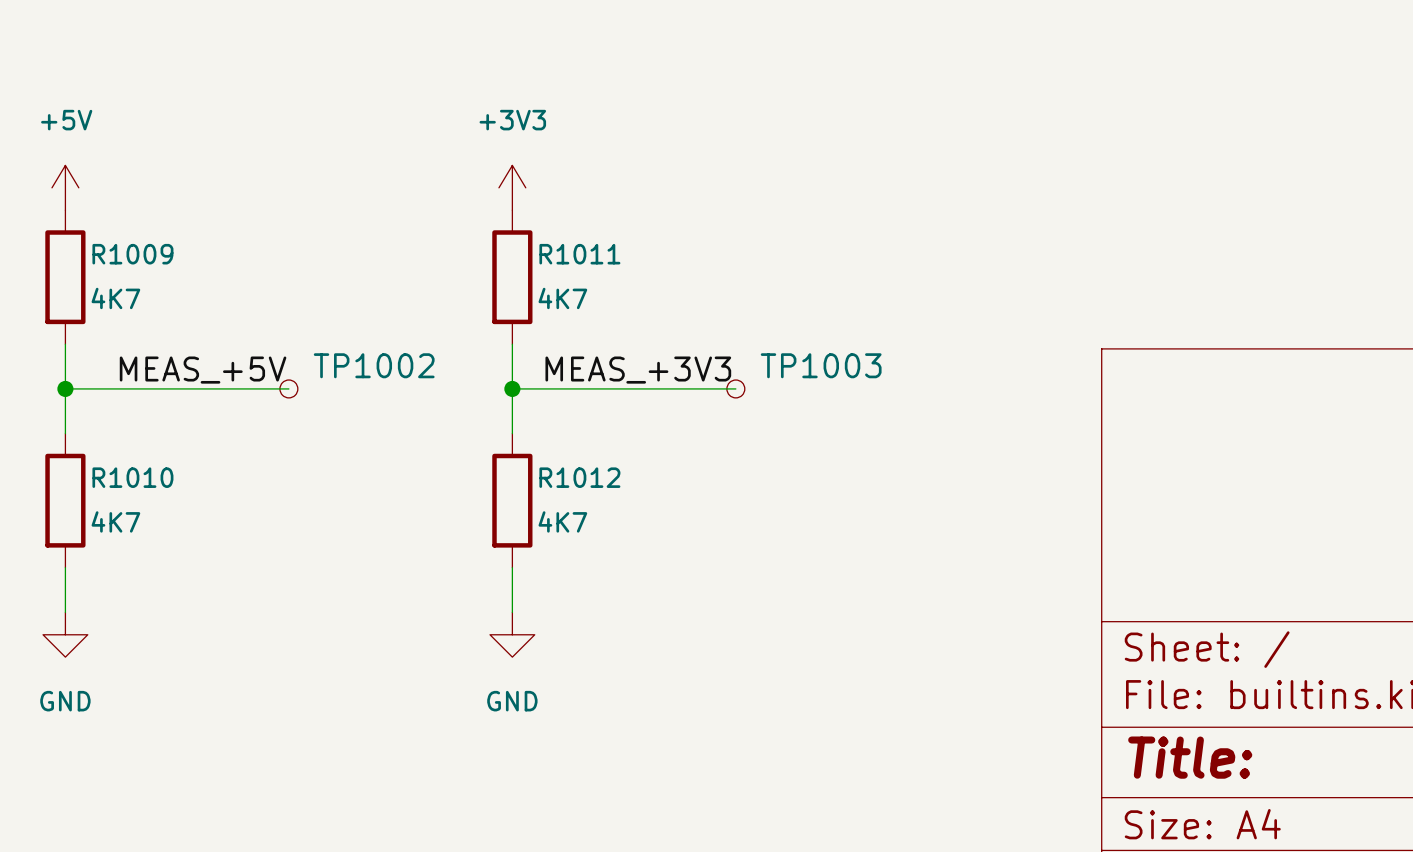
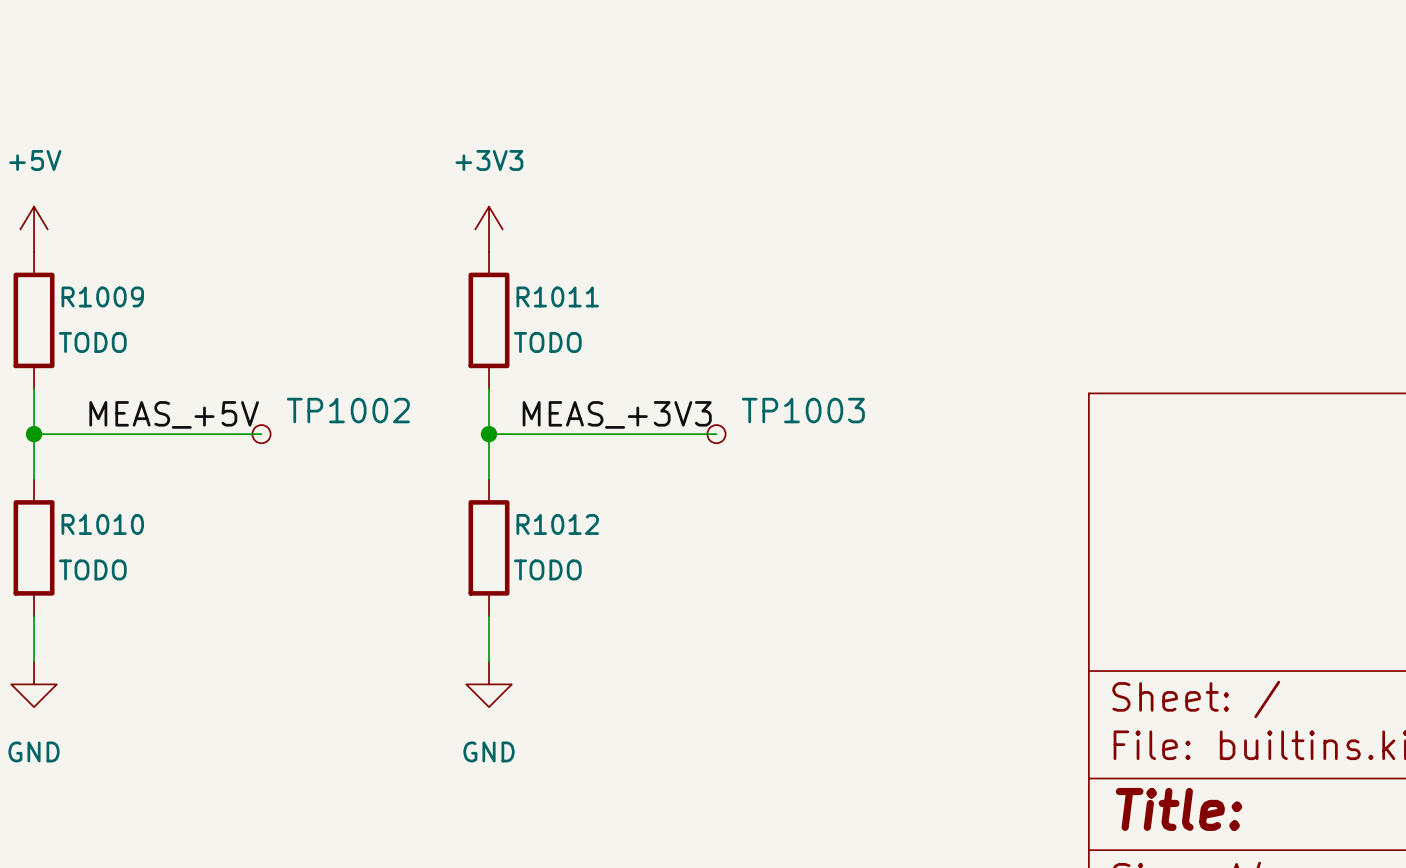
R1009 value: 4K7 (115, 298) -> TODO (92, 342)
R1011 value: 4K7 (562, 298) -> TODO (547, 342)
R1010 value: 4K7 (115, 521) -> TODO (92, 569)
R1012 value: 4K7 (562, 521) -> TODO (547, 569)

